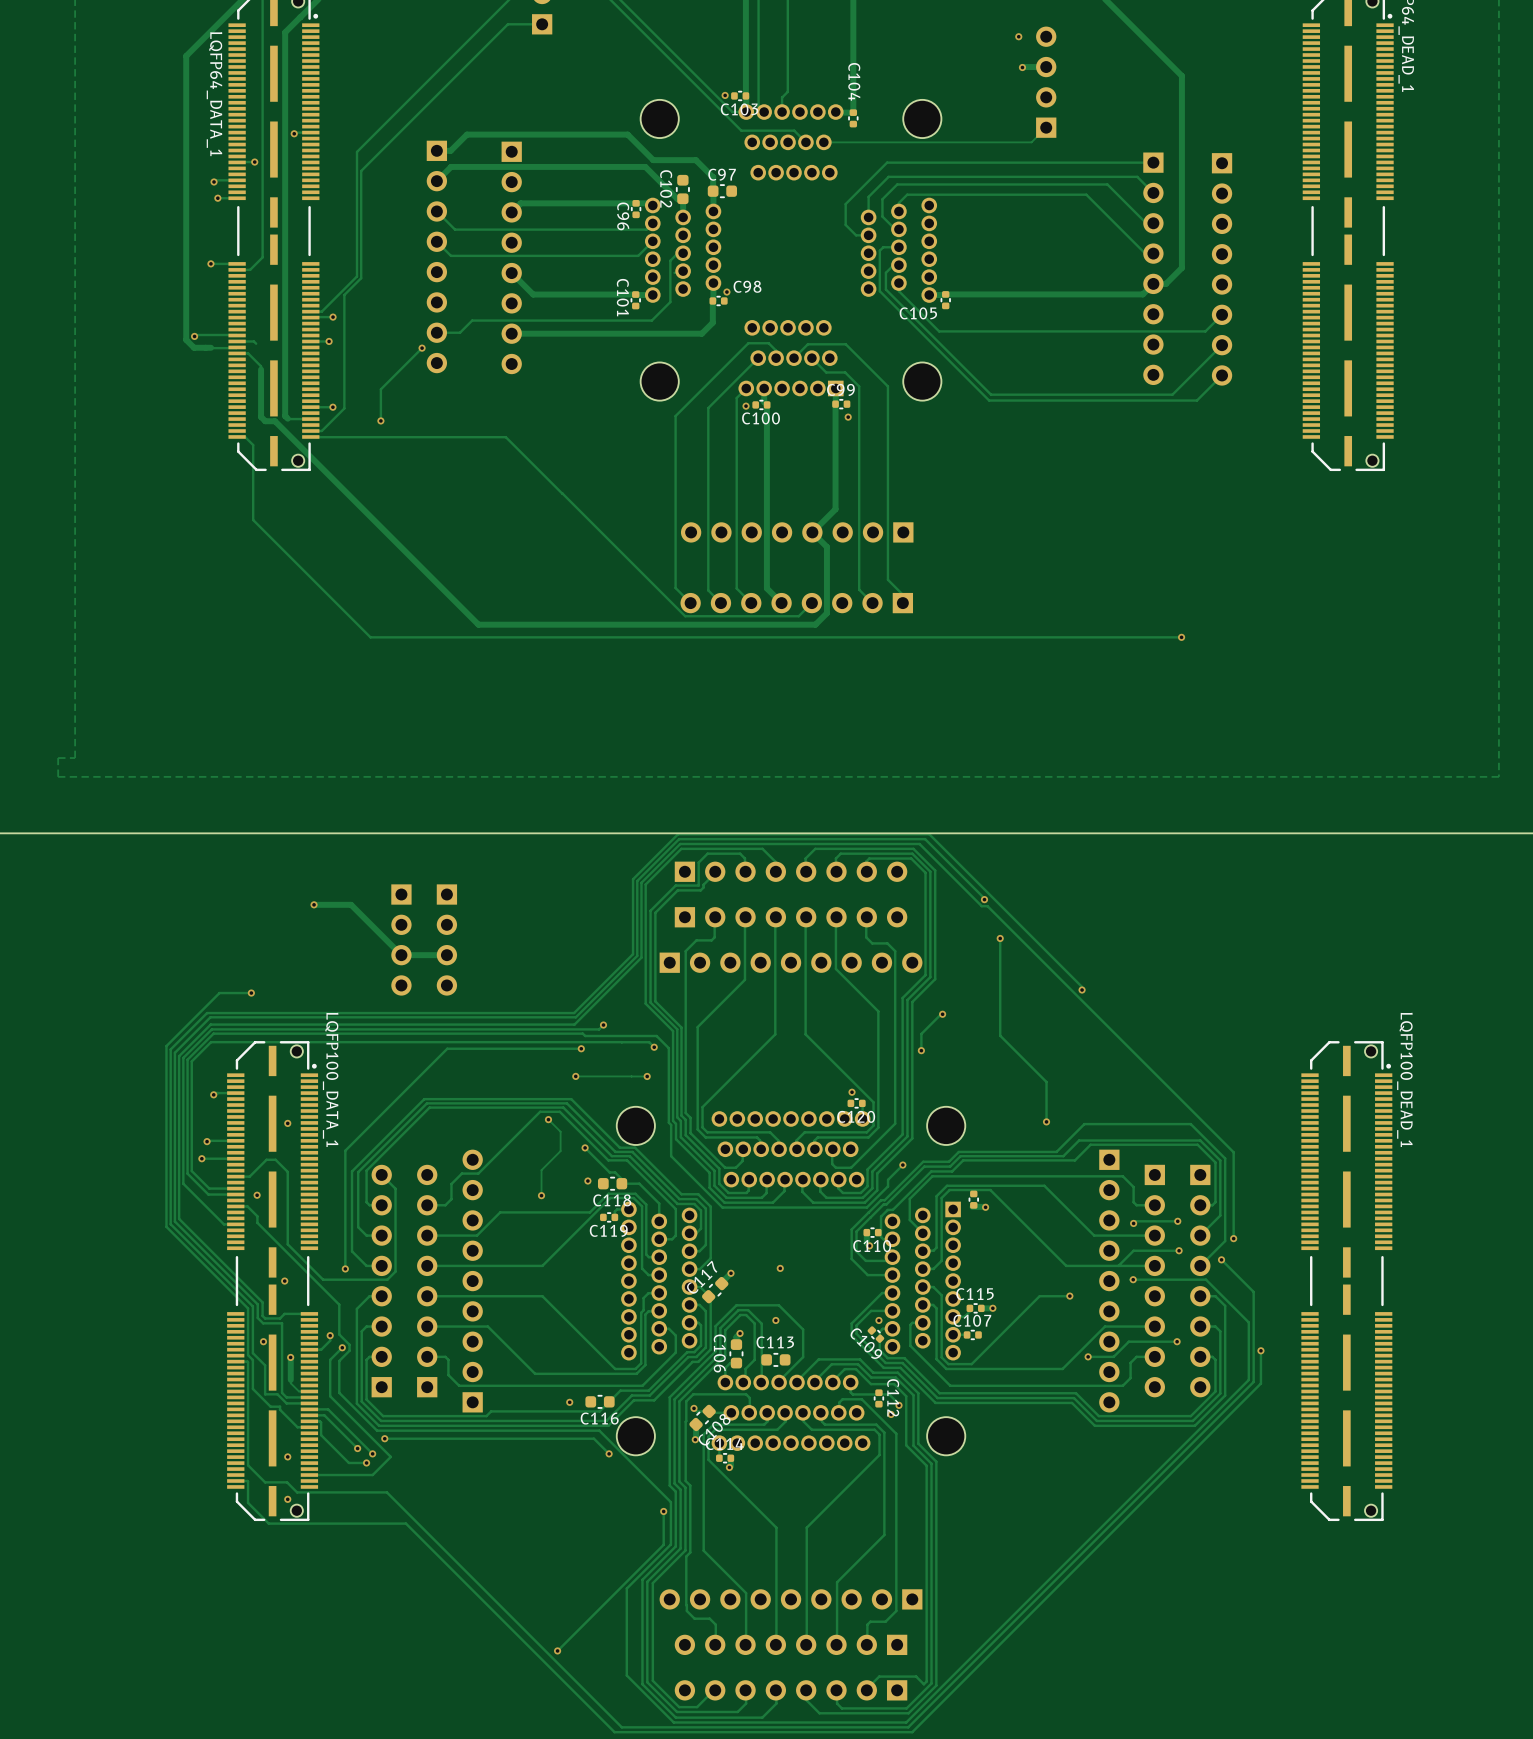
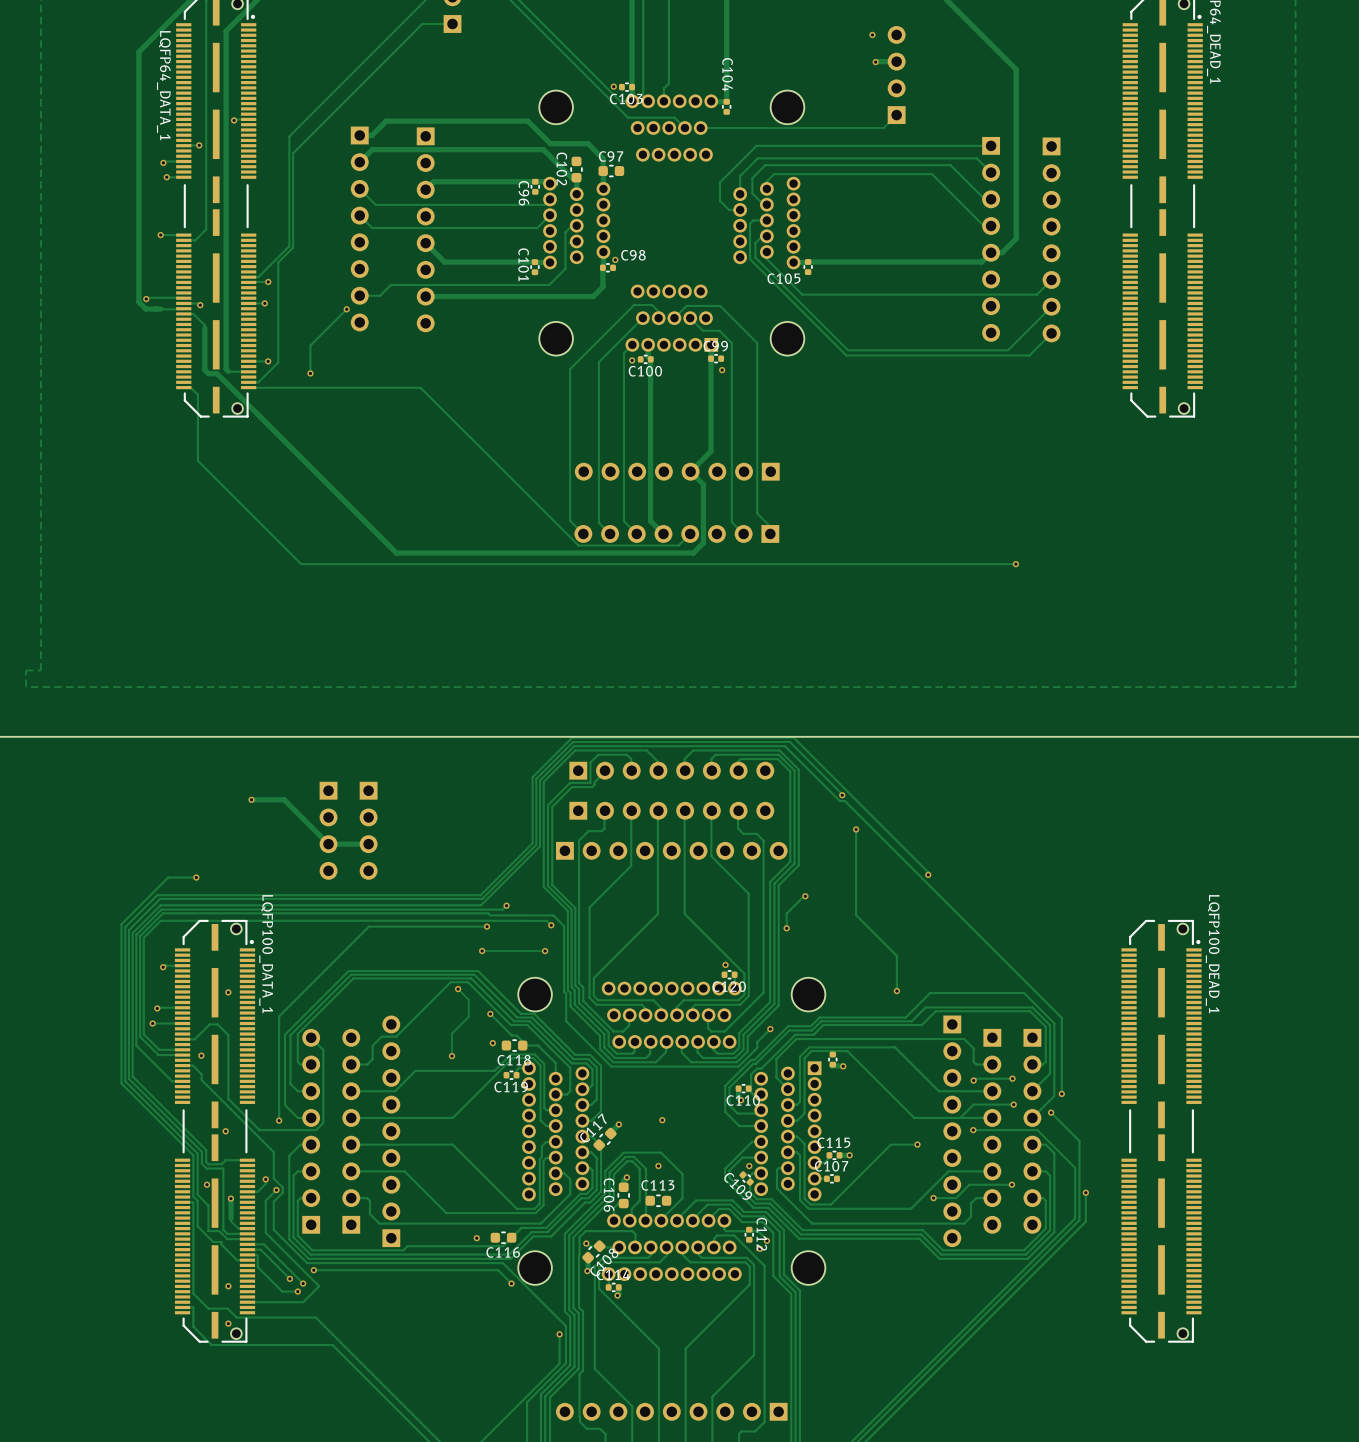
via: none -> (200, 305)

